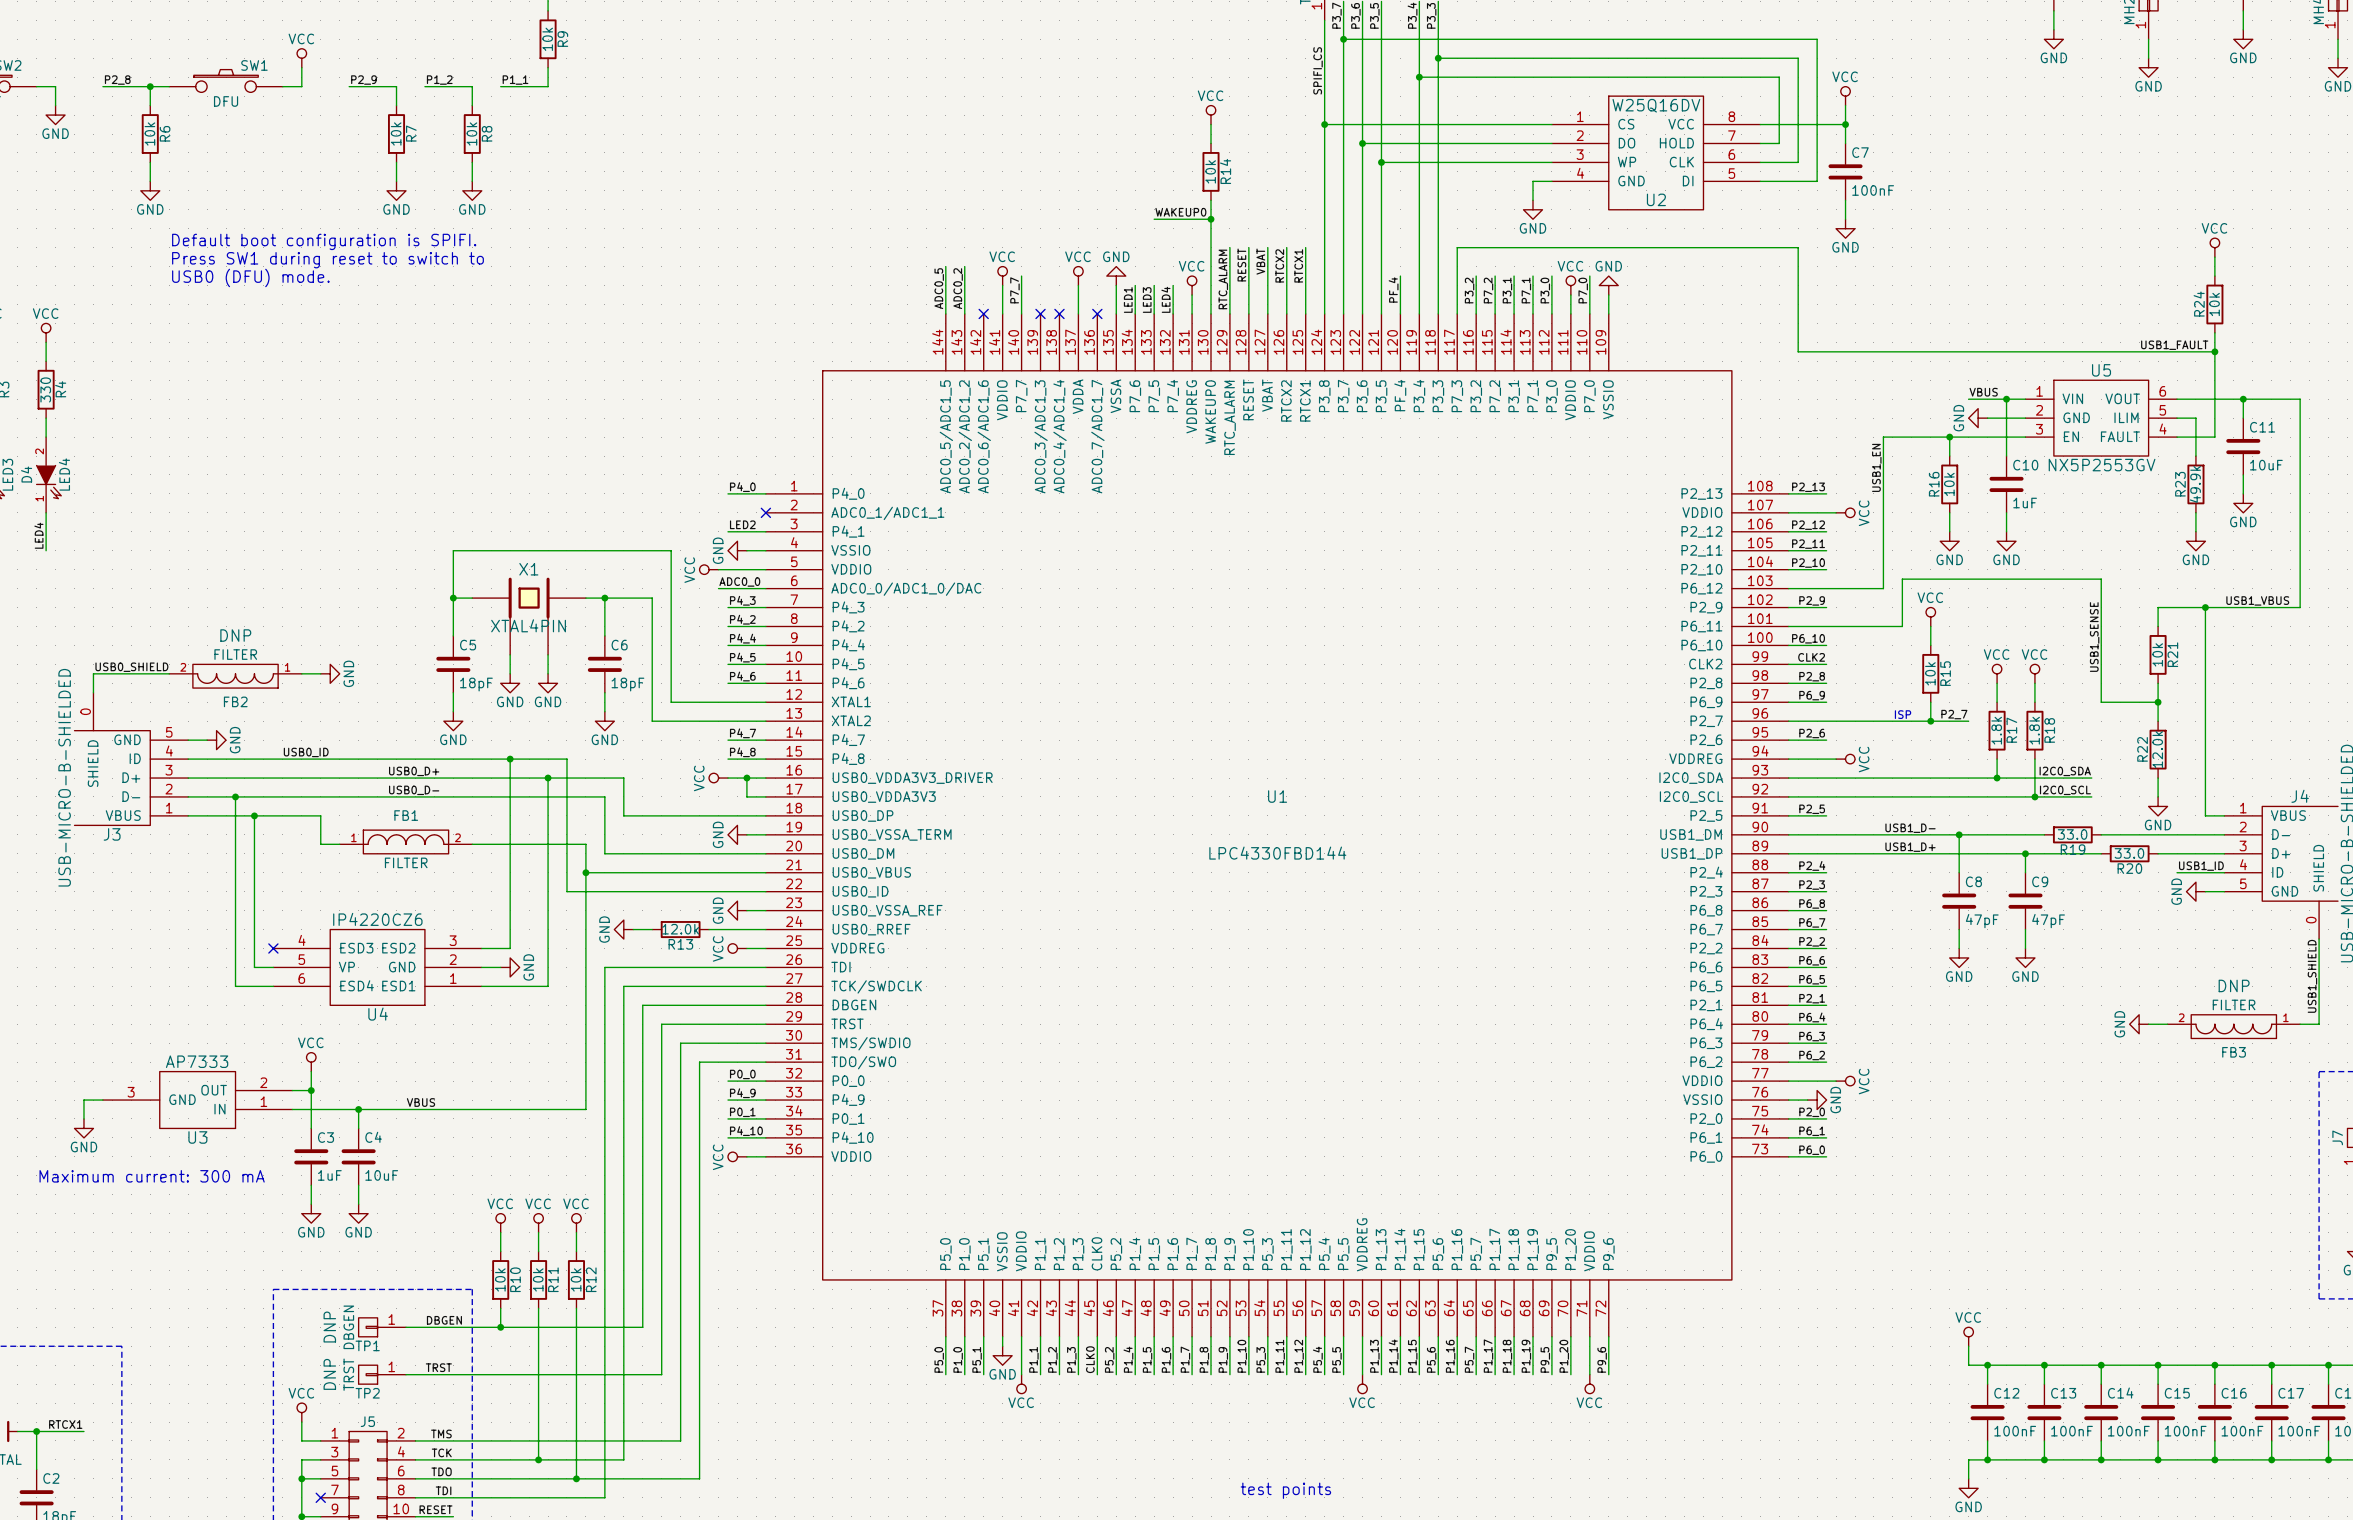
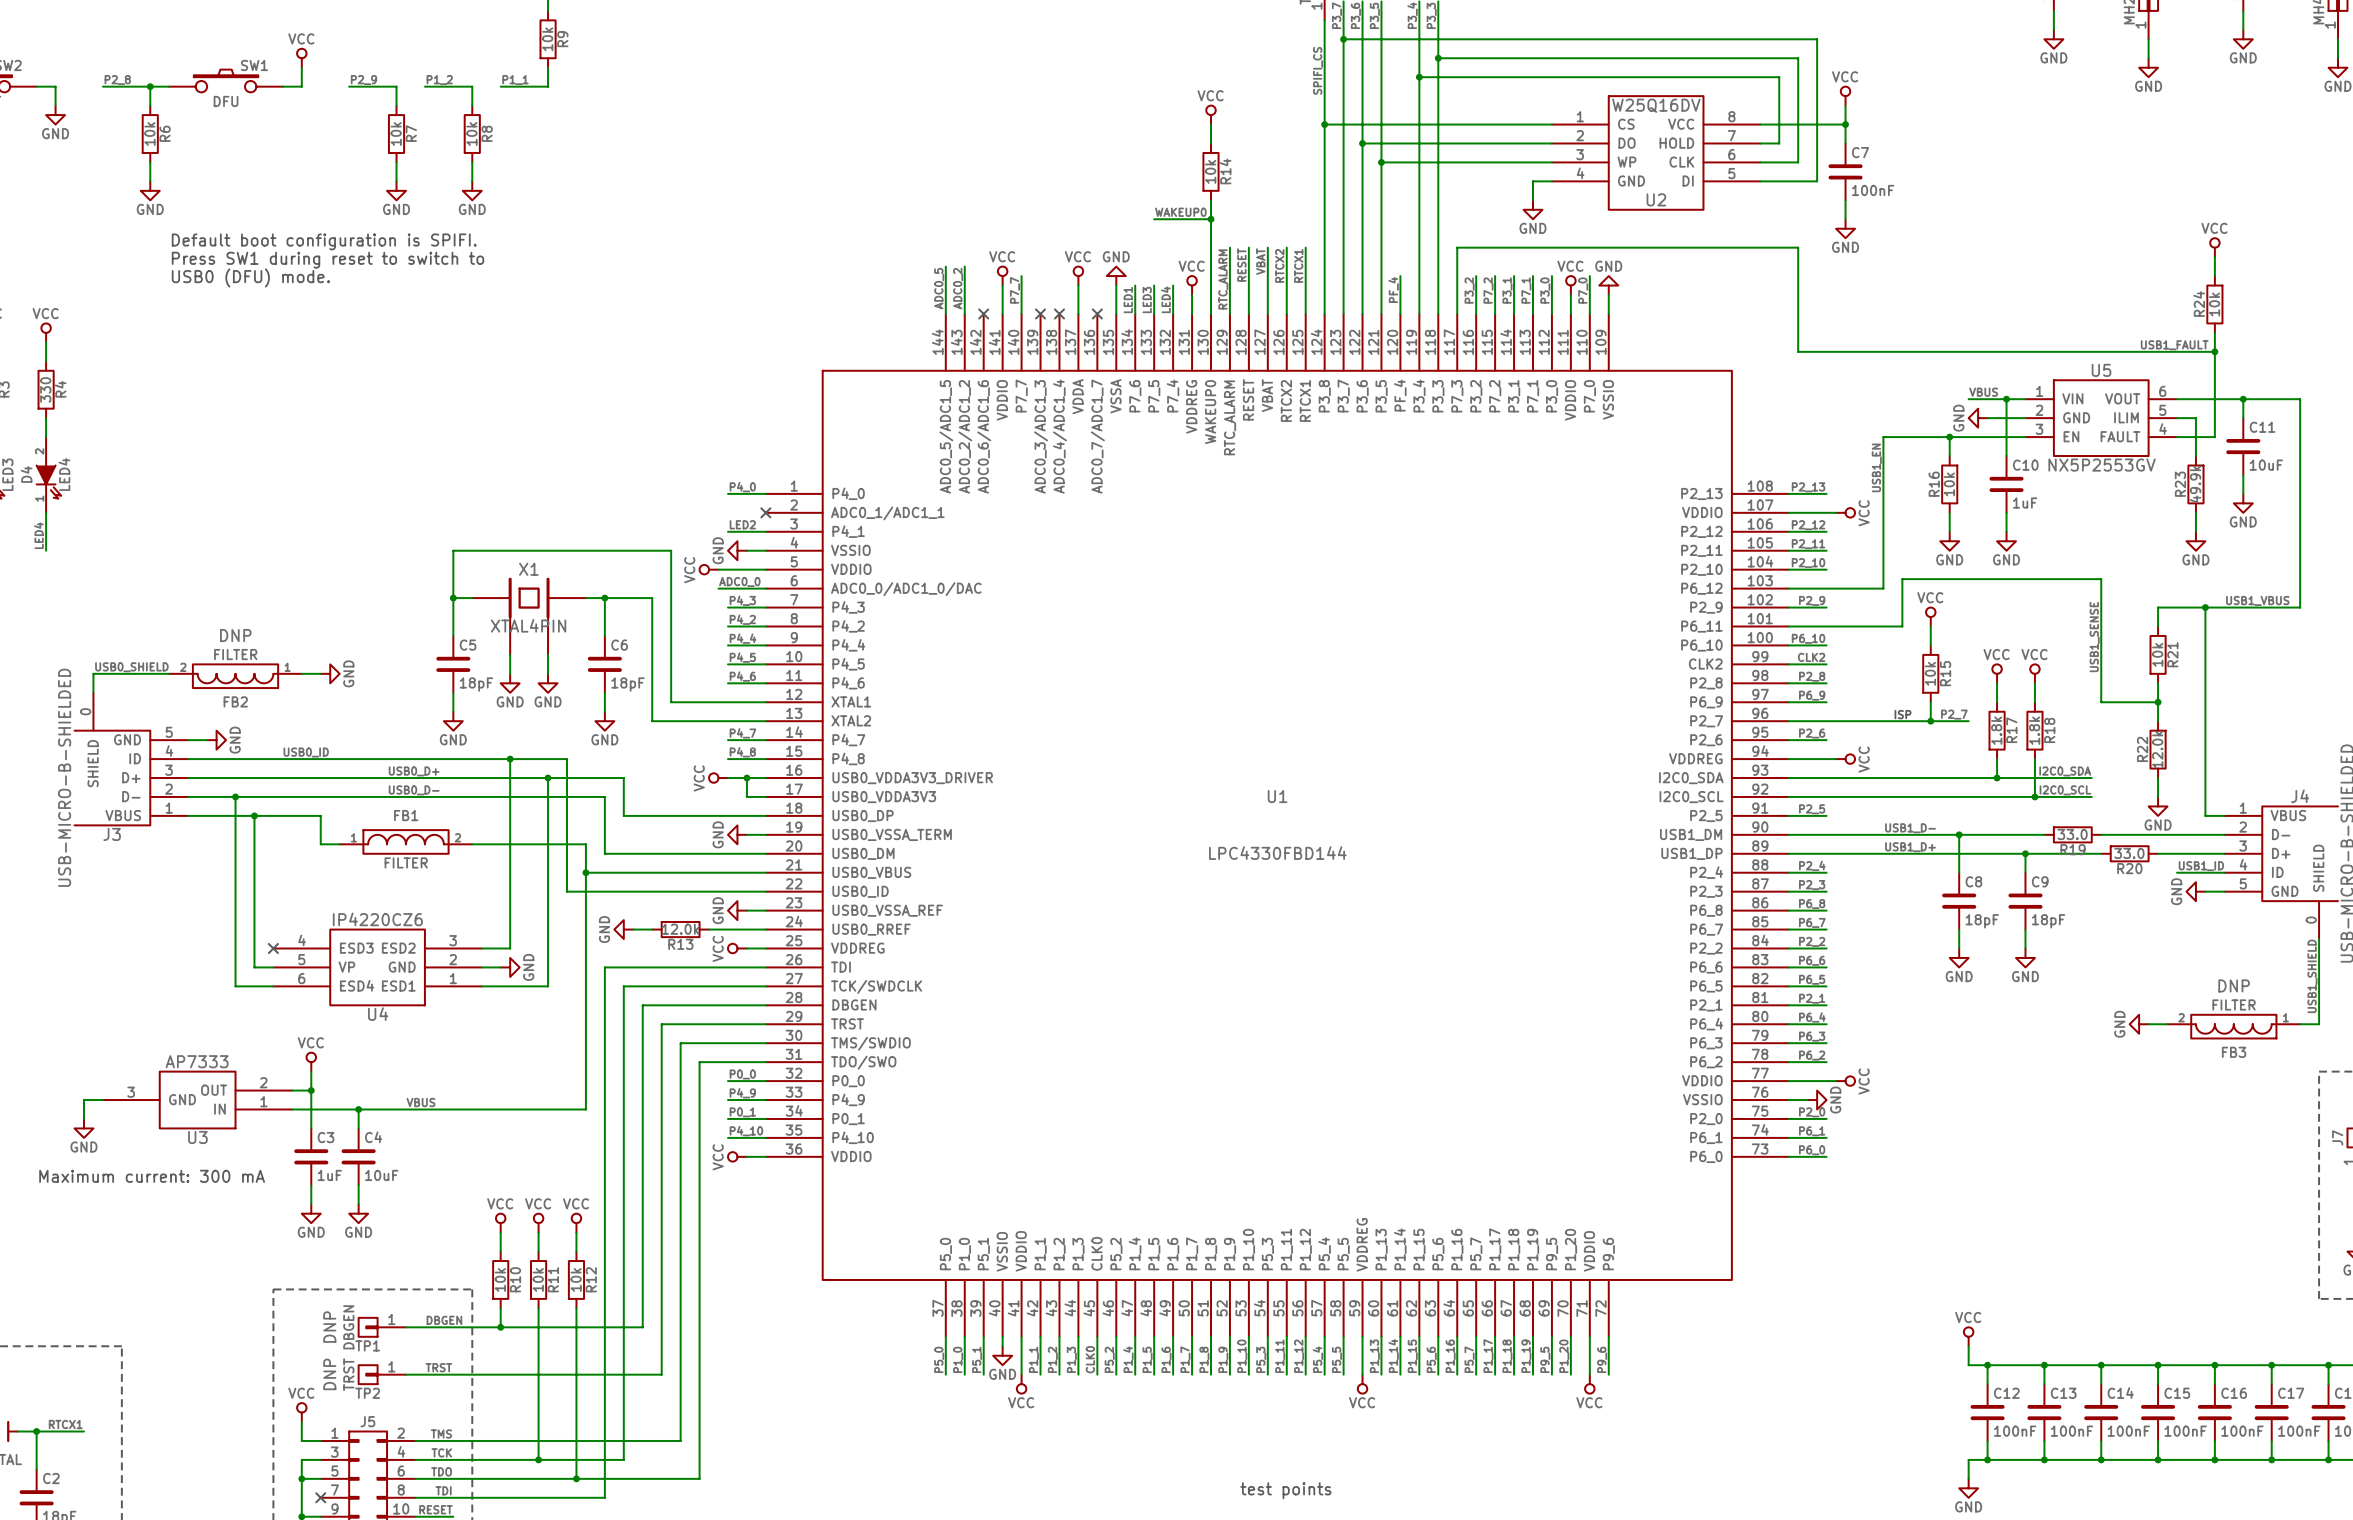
C8 value: 47pF (1982, 921) -> 18pF (1982, 921)
C9 value: 47pF (2048, 921) -> 18pF (2048, 921)

